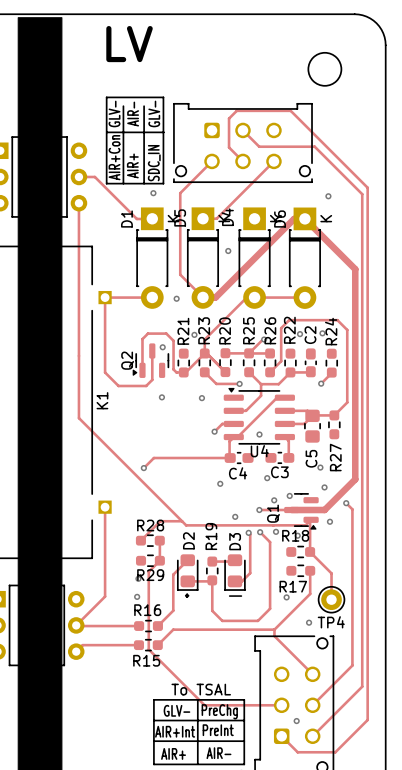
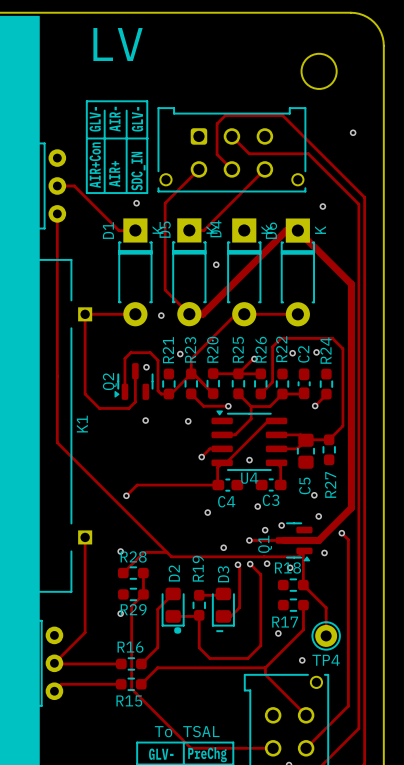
via: none -> (353, 132)
via: none -> (120, 551)
via: (137, 596) -> none

